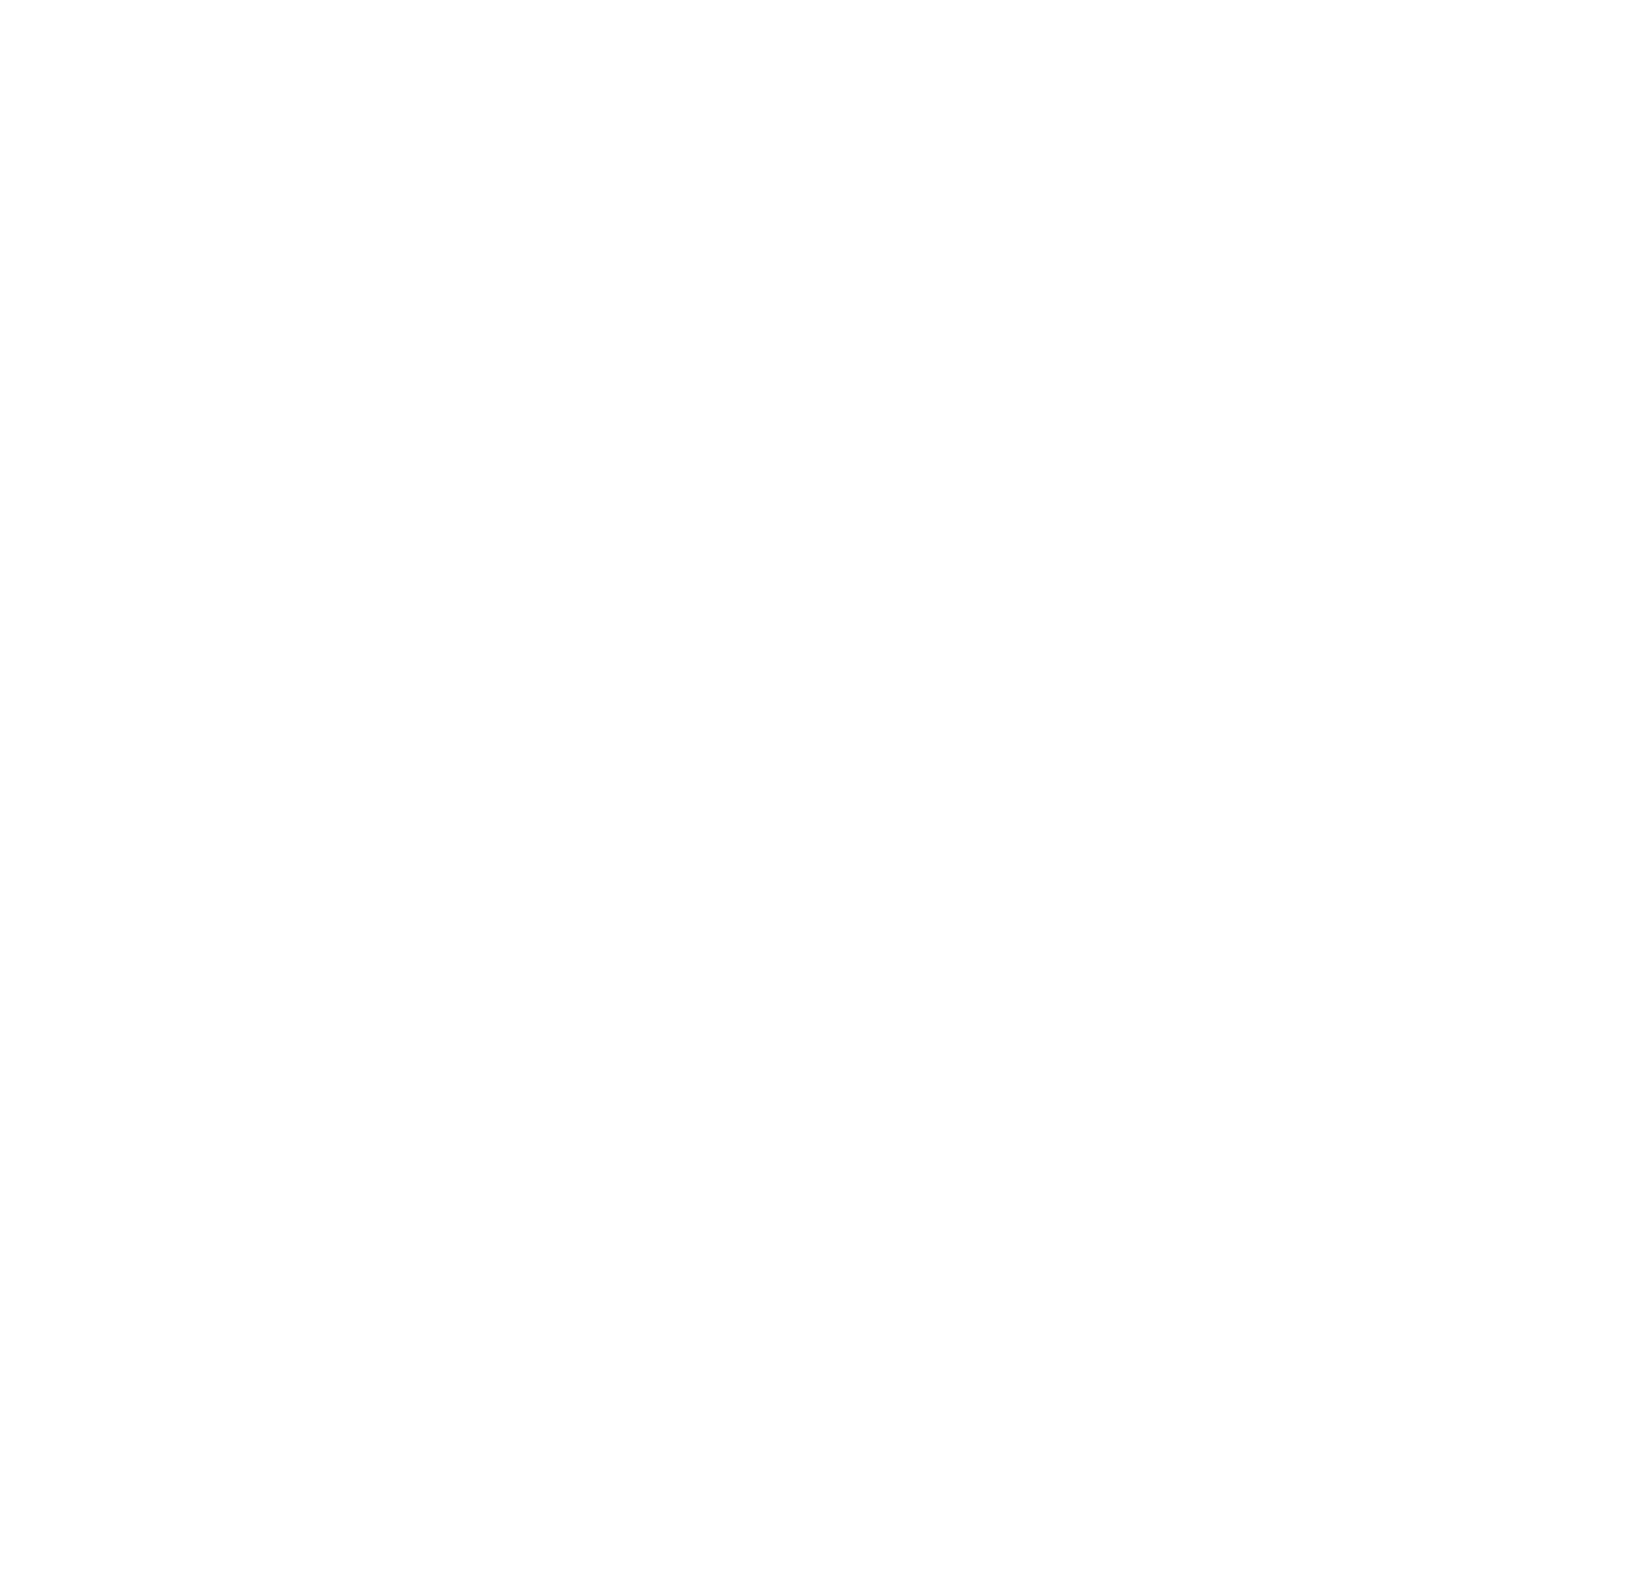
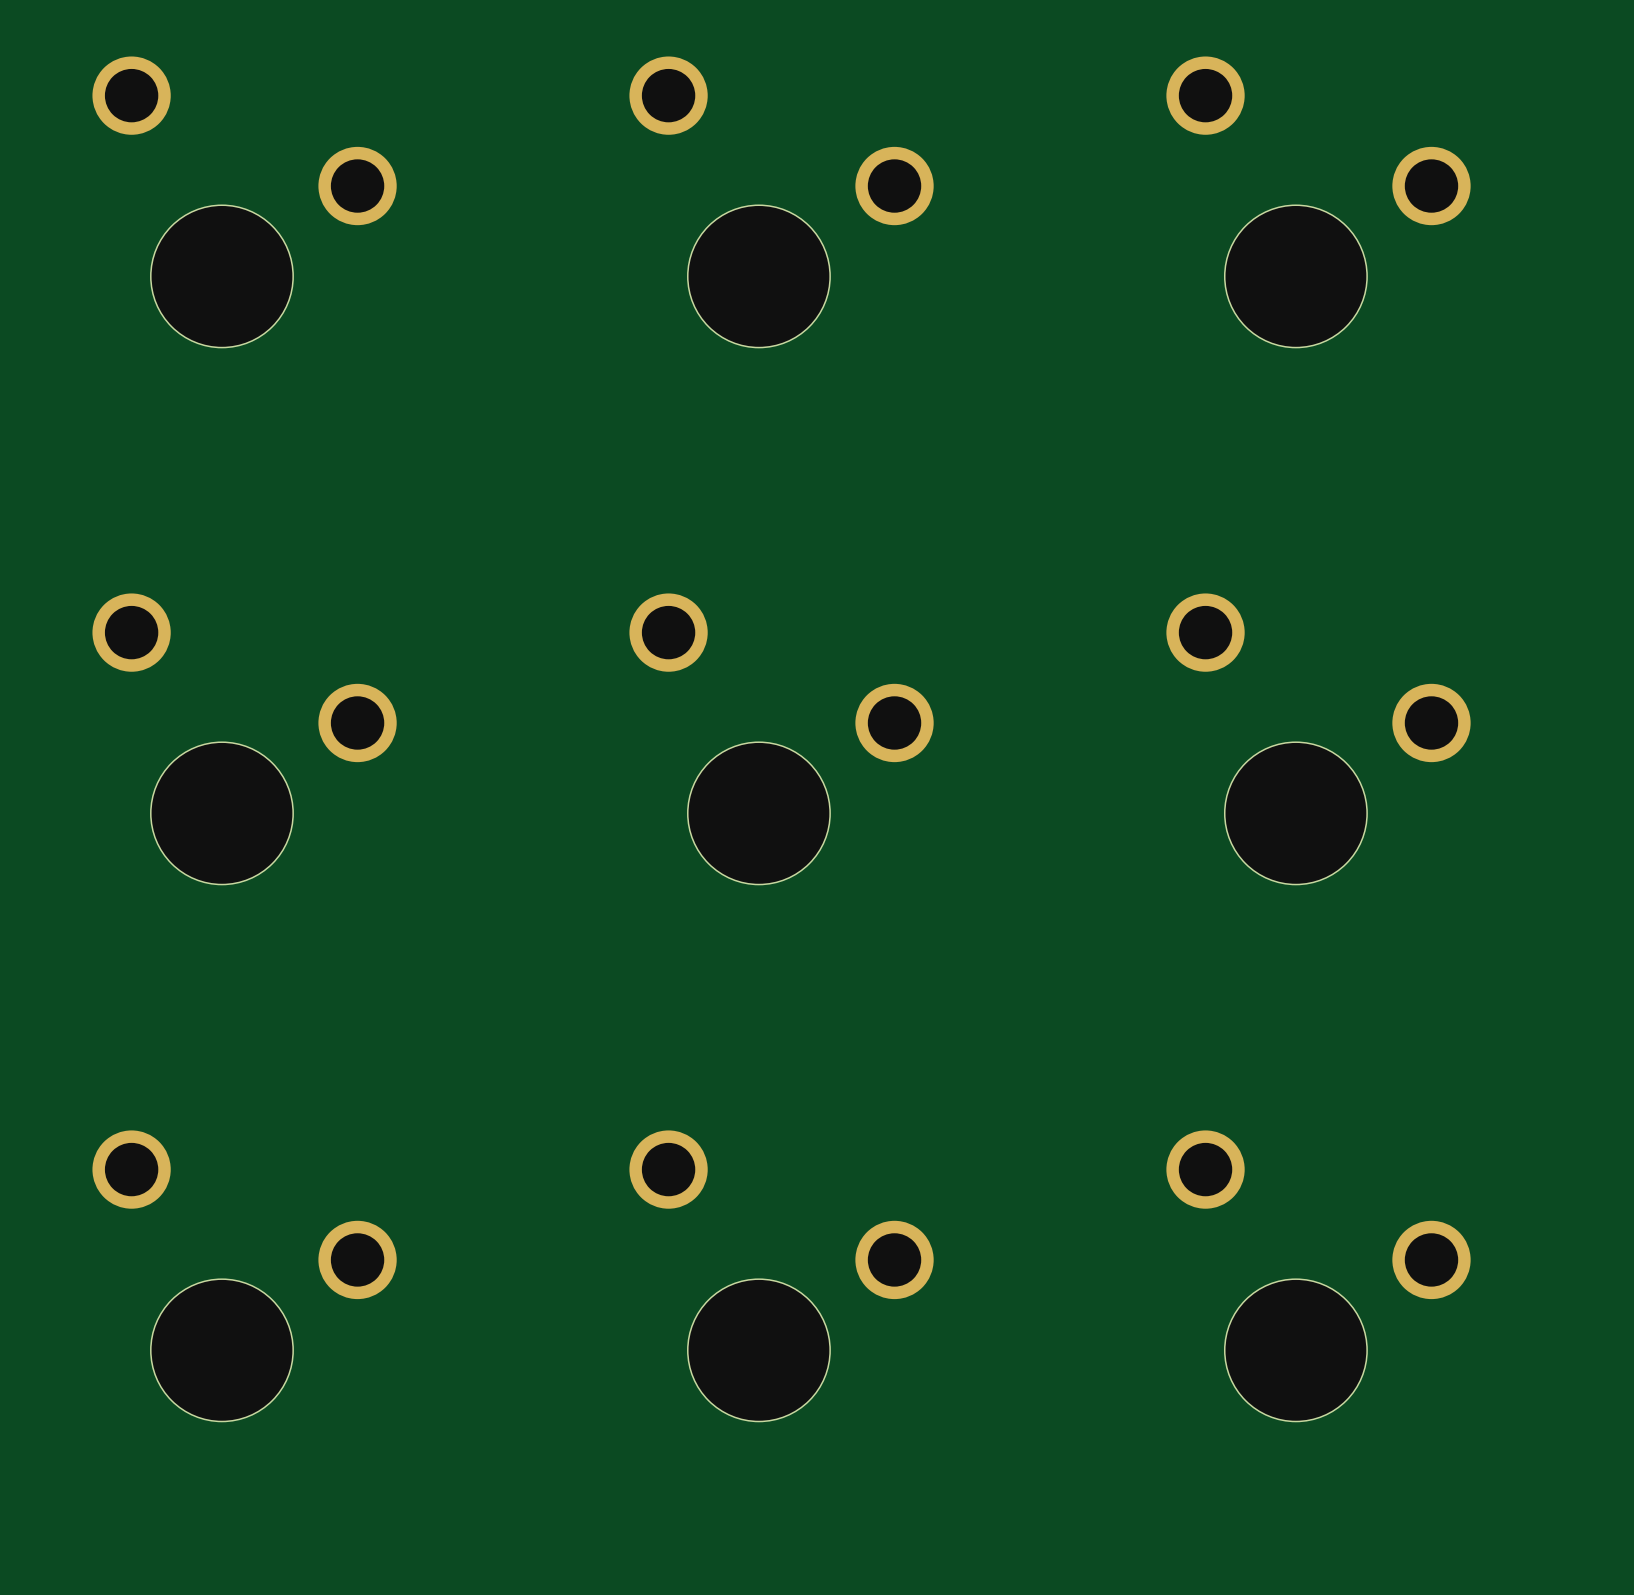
part: none -> (244, 202)
part: none -> (781, 202)
part: none -> (1318, 202)
part: none -> (244, 739)
part: none -> (781, 739)
part: none -> (1318, 739)
part: none -> (244, 1275)
part: none -> (781, 1275)
part: none -> (1318, 1275)

